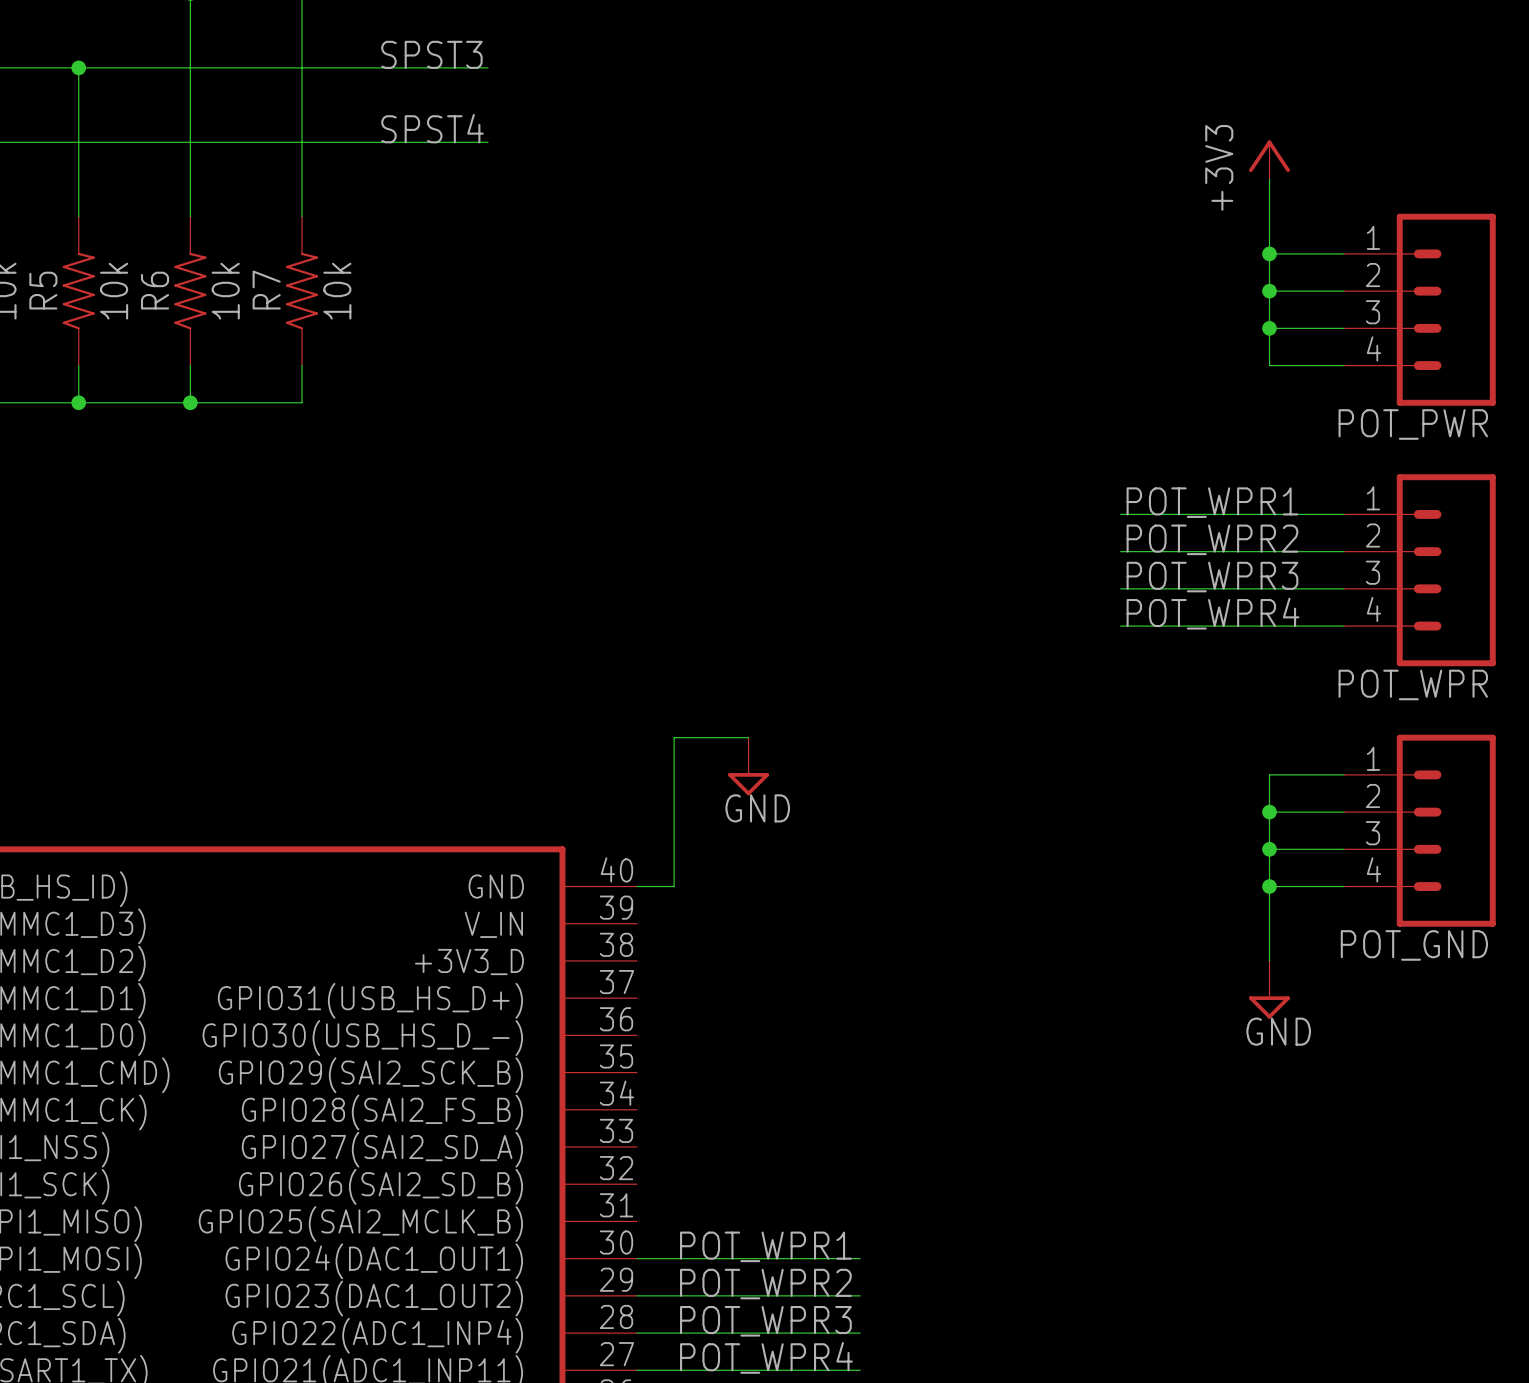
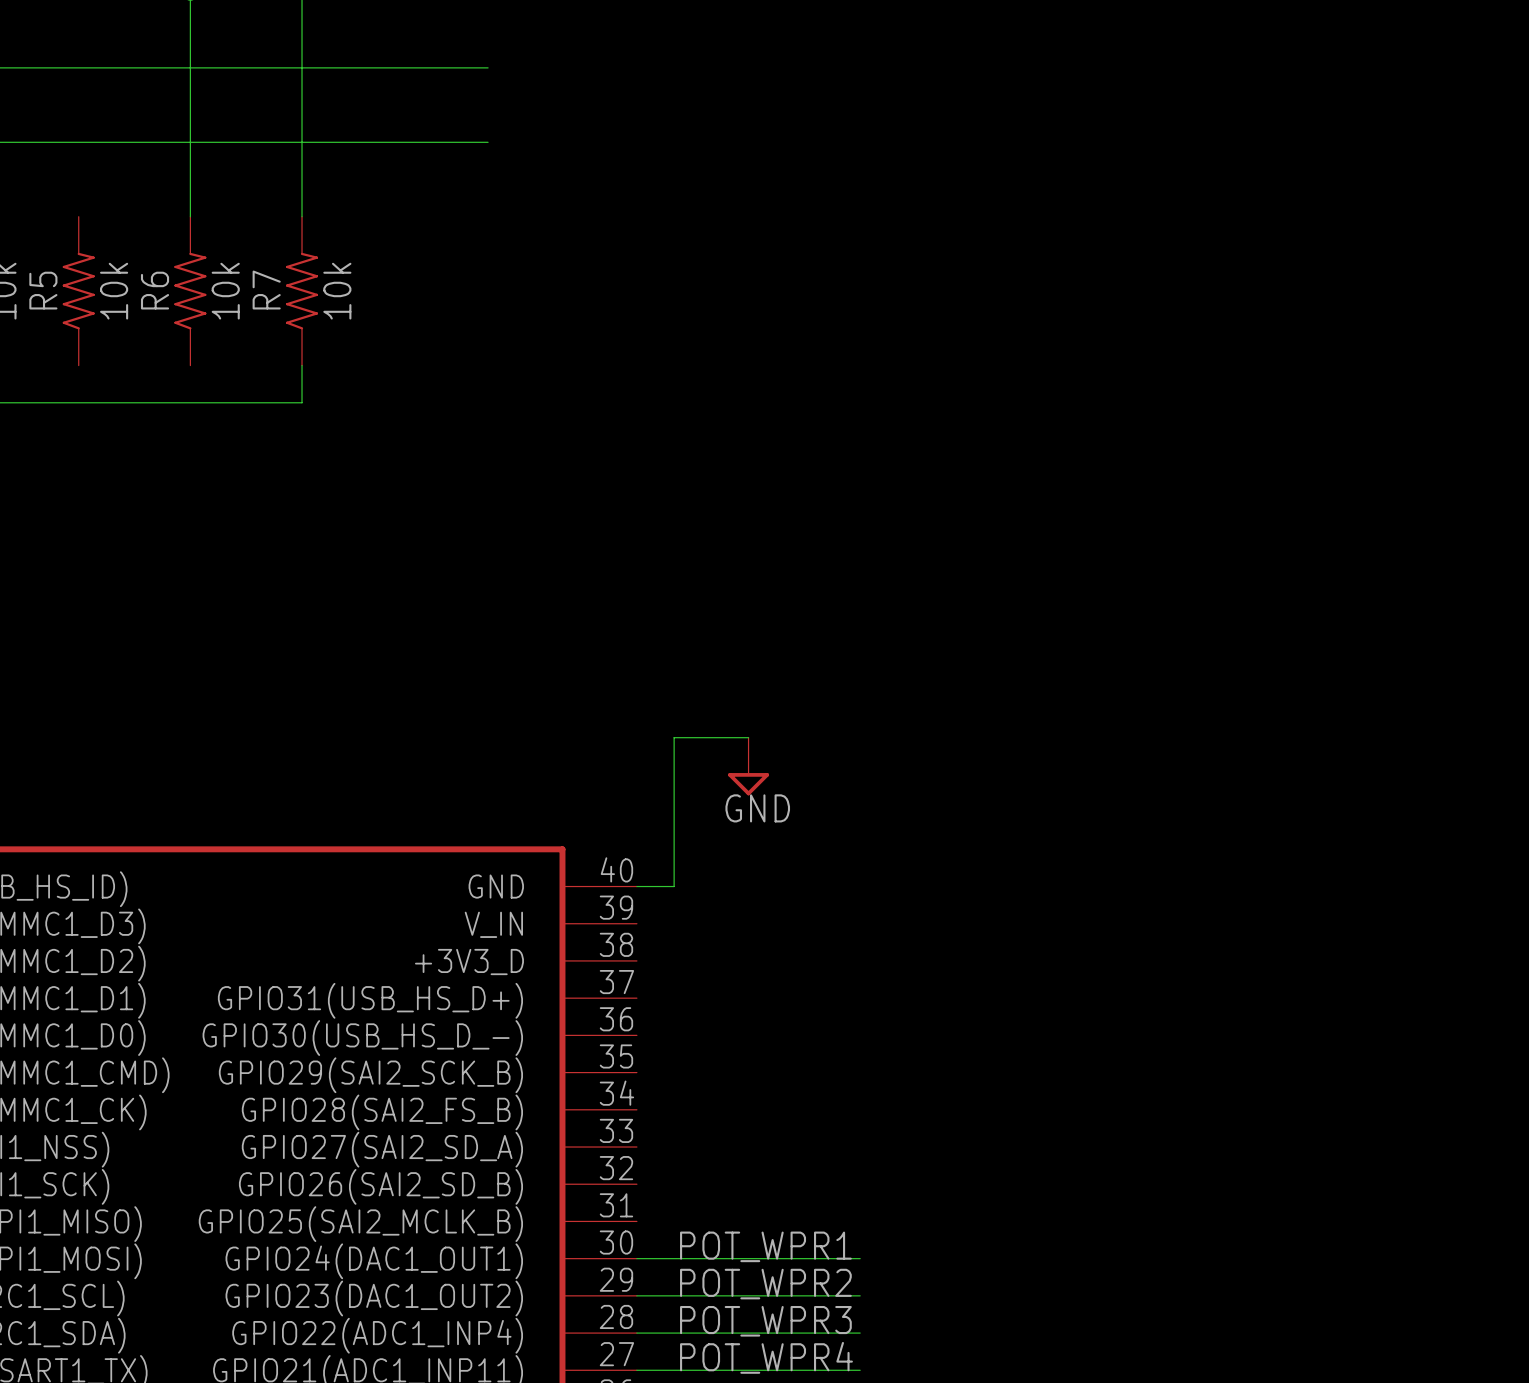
label: SPST3 (431, 54) -> none
wire: (78, 67) (78, 216) -> none
junction: (78, 67) -> none
label: SPST4 (432, 128) -> none
power symbol: +3V3 (1269, 159) -> none
wire: (1269, 179) (1269, 365) (1343, 365) -> none
wire: (1269, 253) (1343, 253) -> none
junction: (1269, 253) -> none
wire: (1269, 291) (1343, 291) -> none
junction: (1269, 291) -> none
POT_PWR: (1419, 309) -> none
wire: (1269, 328) (1343, 328) -> none
junction: (1269, 328) -> none
wire: (78, 365) (78, 402) -> none
wire: (190, 365) (190, 402) -> none
junction: (78, 402) -> none
junction: (190, 402) -> none
label: POT_WPR1 (1212, 502) -> none
wire: (1120, 514) (1343, 514) -> none
label: POT_WPR2 (1212, 539) -> none
wire: (1120, 551) (1343, 551) -> none
POT_WPR: (1419, 570) -> none
label: POT_WPR3 (1212, 577) -> none
wire: (1120, 588) (1343, 588) -> none
label: POT_WPR4 (1213, 613) -> none
wire: (1120, 626) (1343, 626) -> none
wire: (1343, 774) (1269, 774) (1269, 960) -> none
wire: (1269, 812) (1343, 812) -> none
junction: (1269, 812) -> none
POT_GND: (1419, 830) -> none
wire: (1269, 849) (1343, 849) -> none
junction: (1269, 849) -> none
wire: (1269, 886) (1343, 886) -> none
junction: (1269, 886) -> none
power symbol: GND (1269, 989) -> none

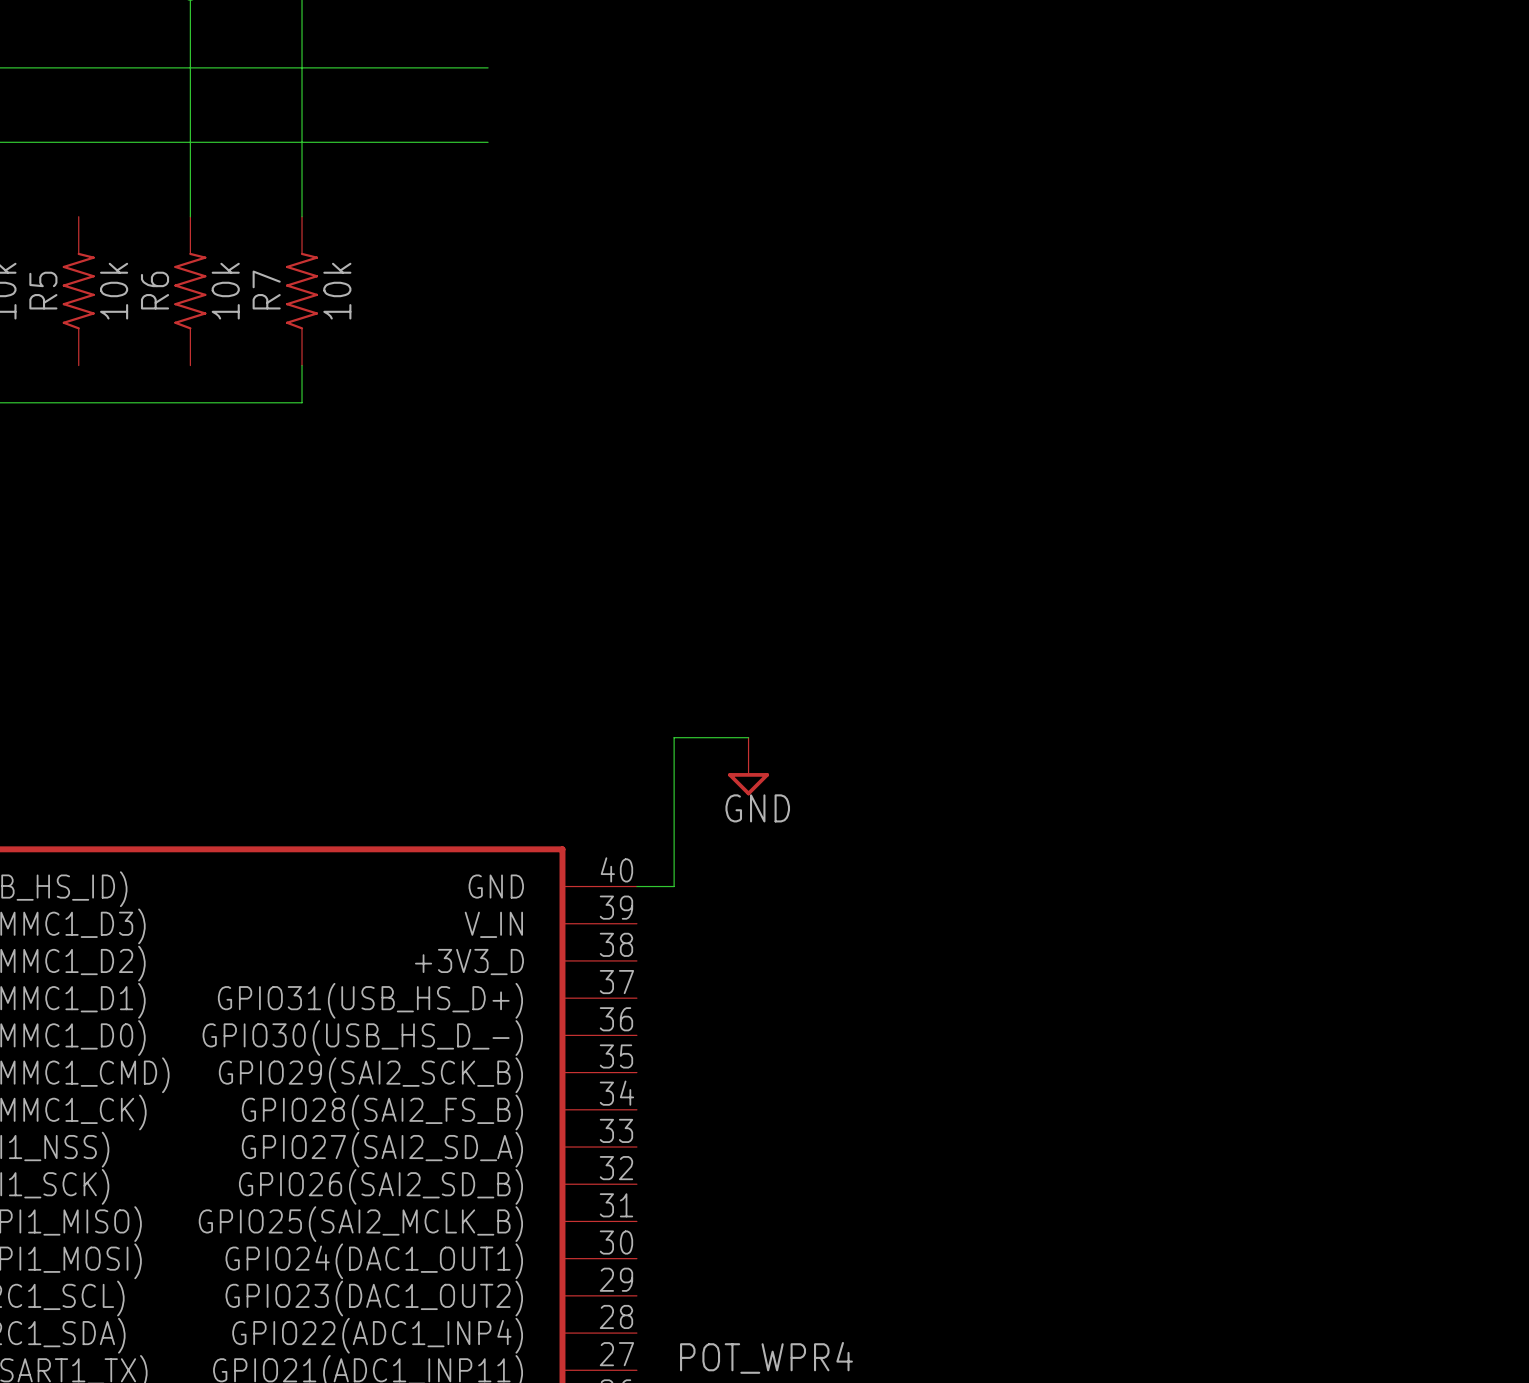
label: POT_WPR1 (765, 1246) -> none
wire: (636, 1258) (860, 1258) -> none
label: POT_WPR2 (765, 1284) -> none
wire: (636, 1295) (860, 1295) -> none
label: POT_WPR3 (765, 1321) -> none
wire: (636, 1333) (860, 1333) -> none
wire: (636, 1370) (860, 1370) -> none

